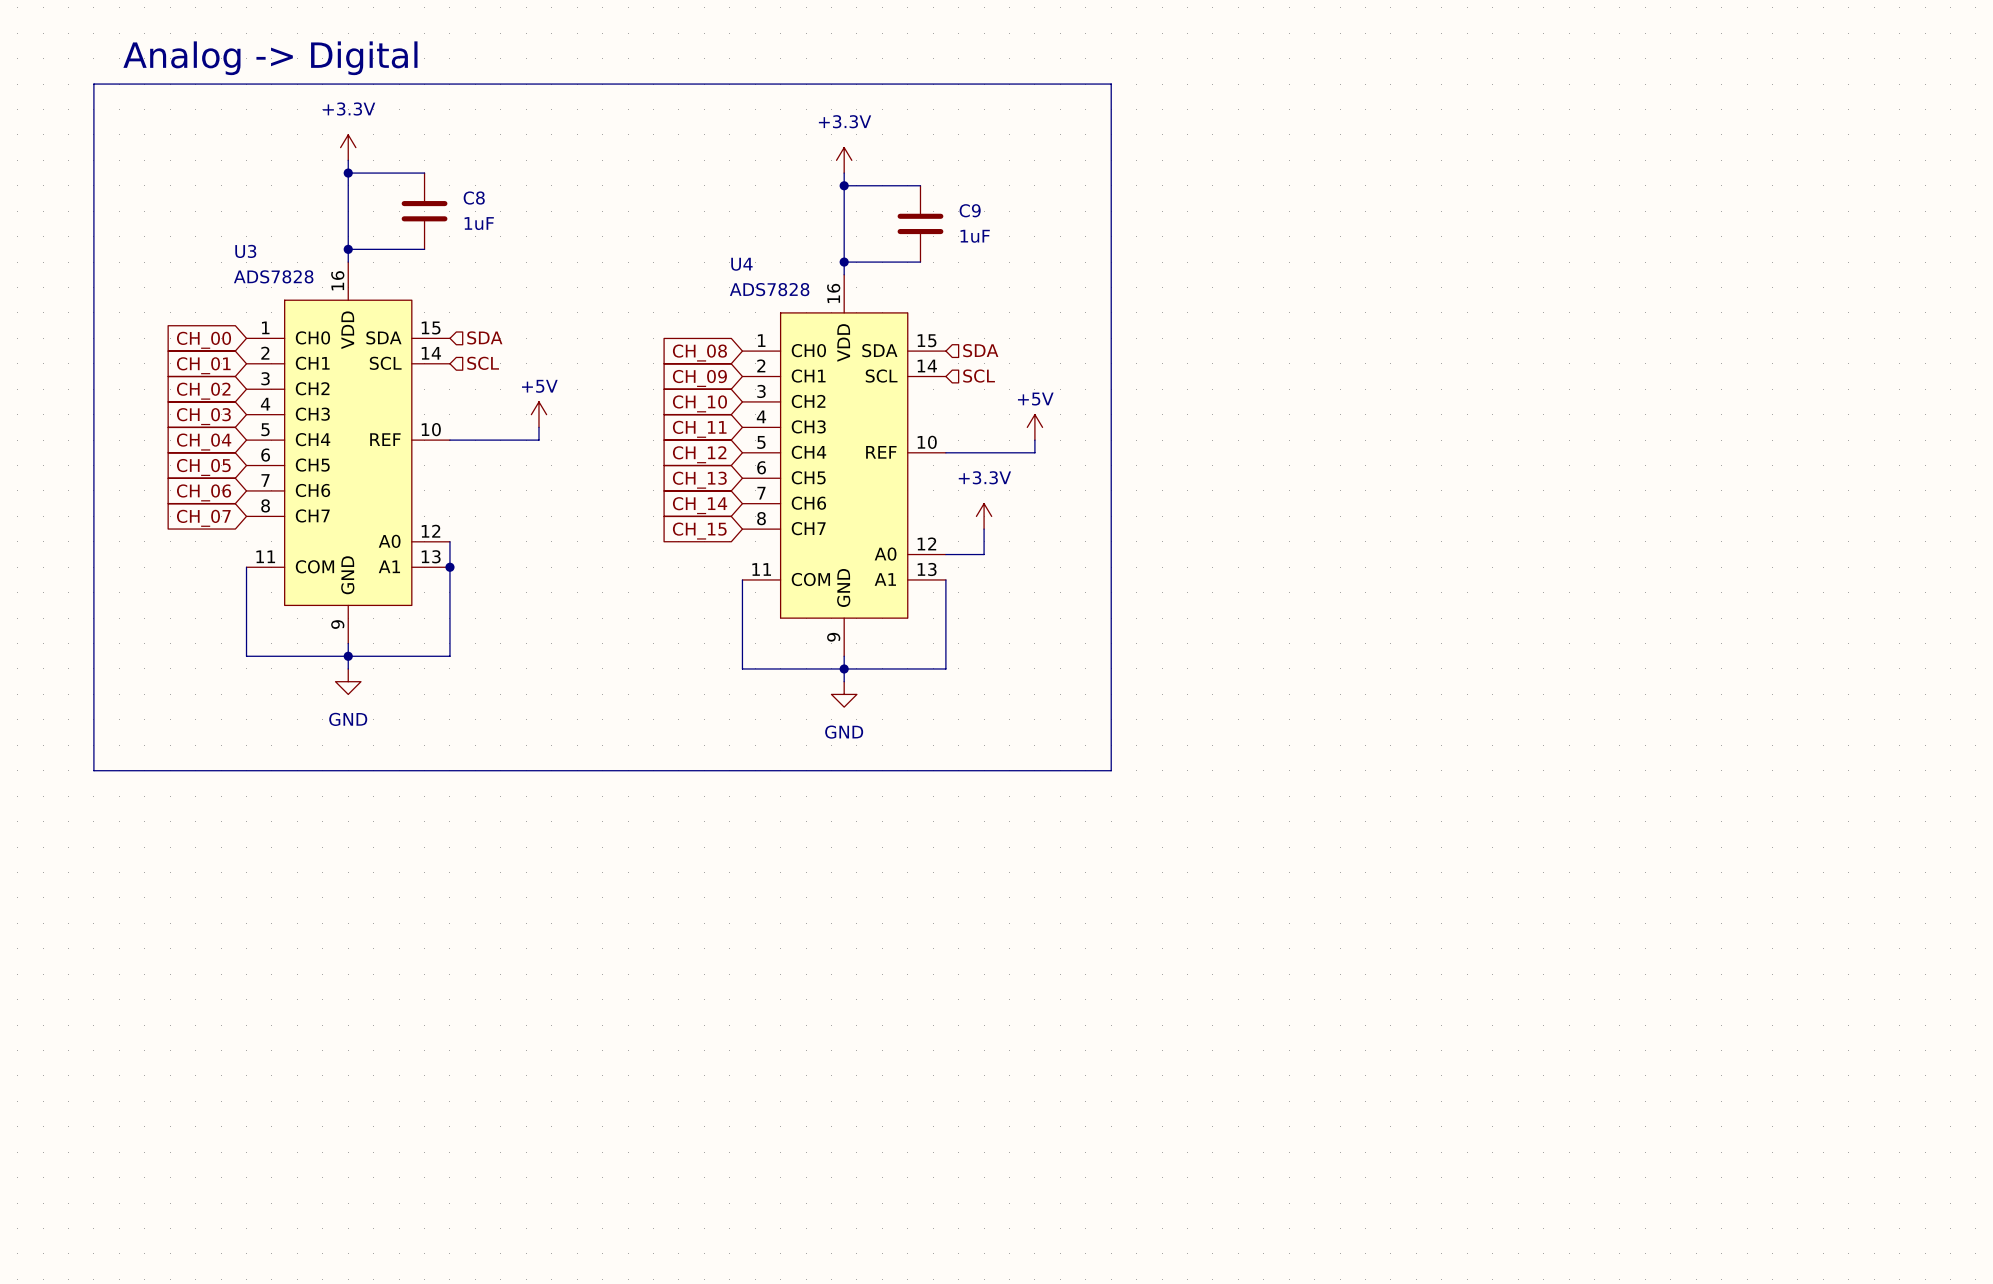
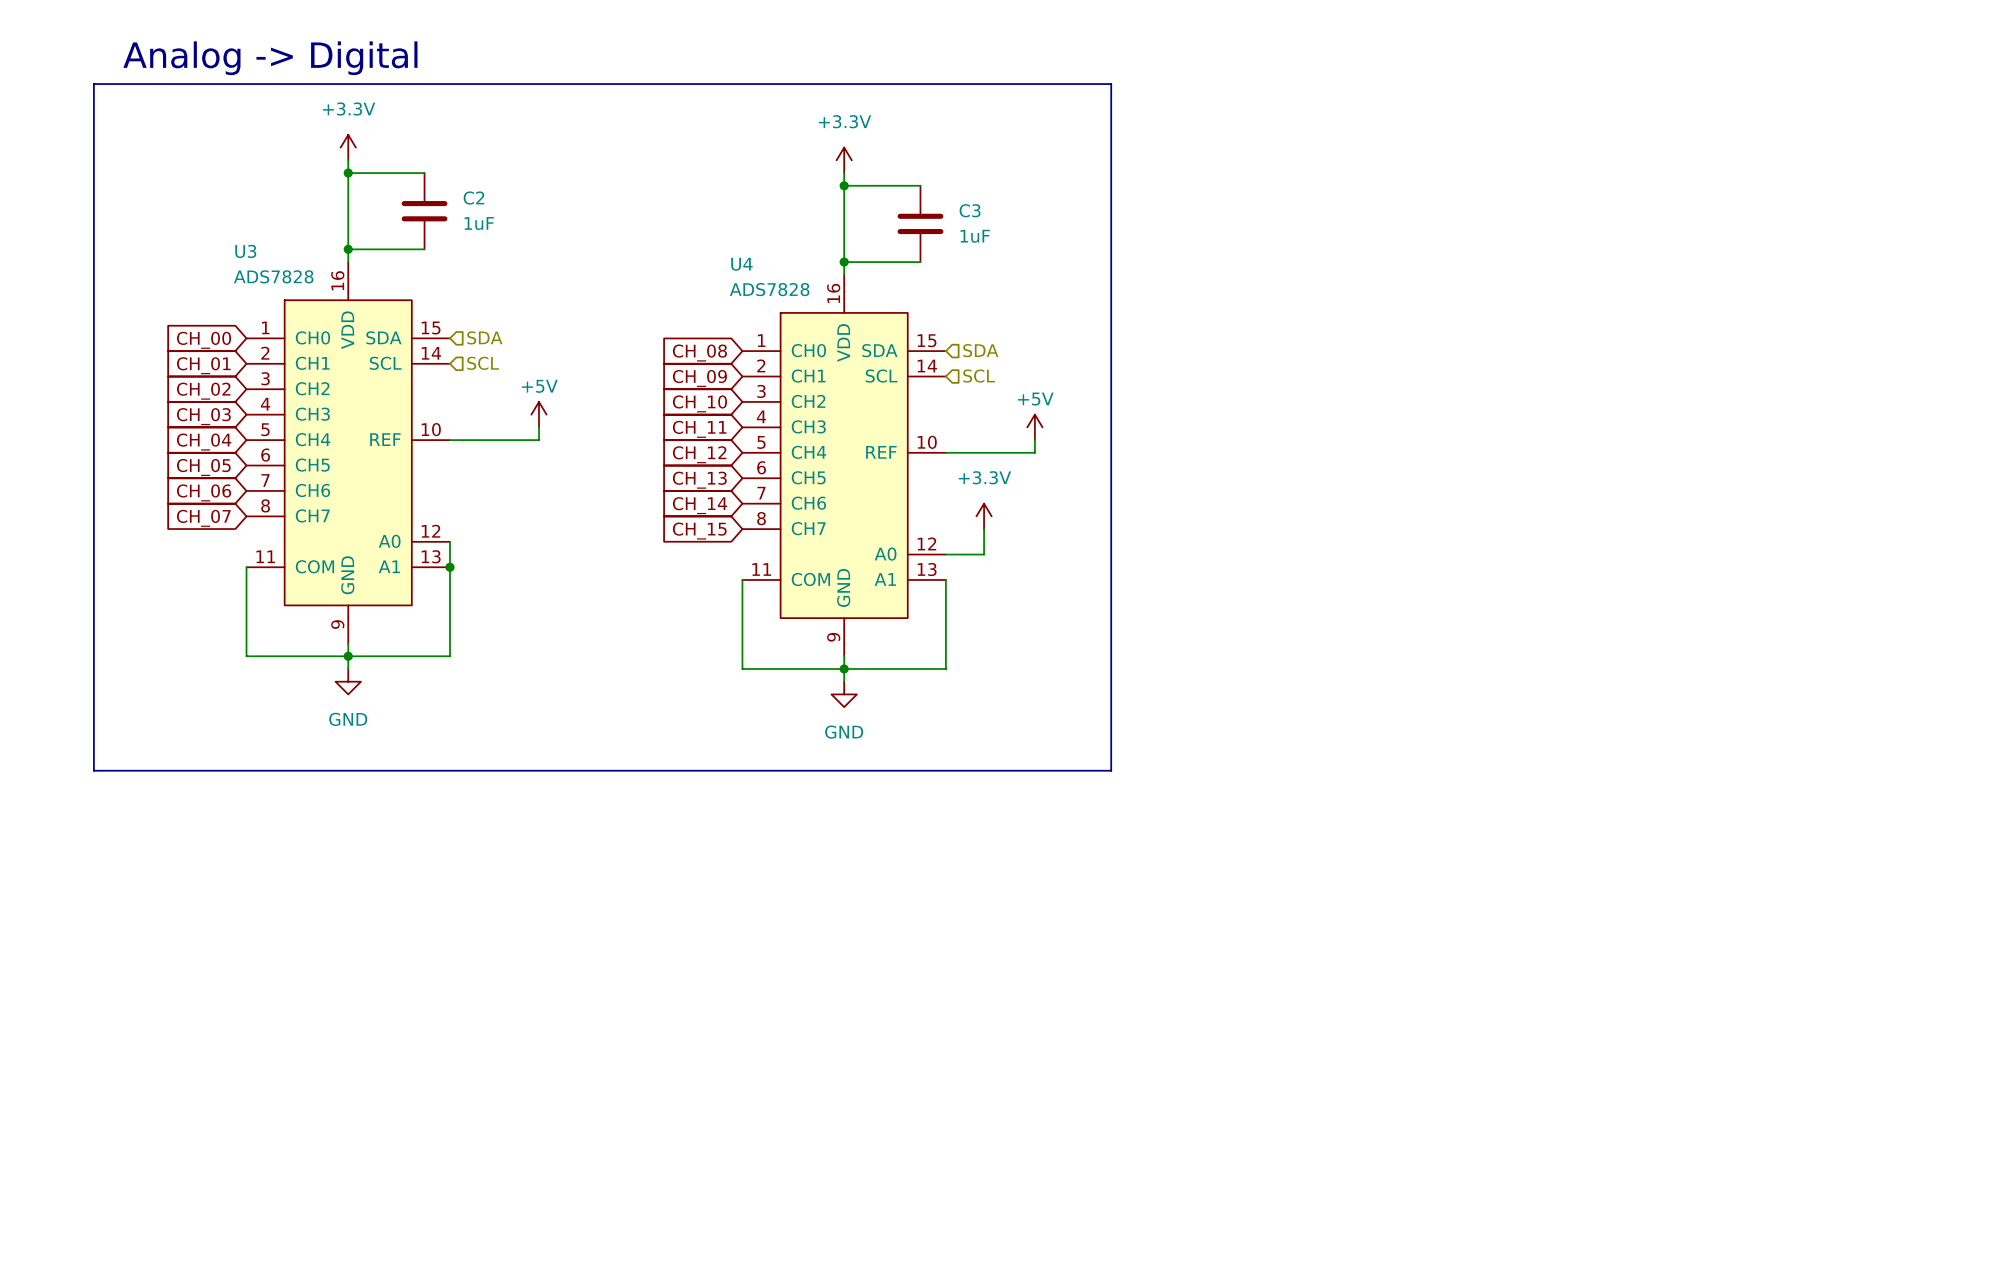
C8 name: C8 (474, 198) -> C2 (473, 198)
C9 name: C9 (970, 210) -> C3 (970, 210)

